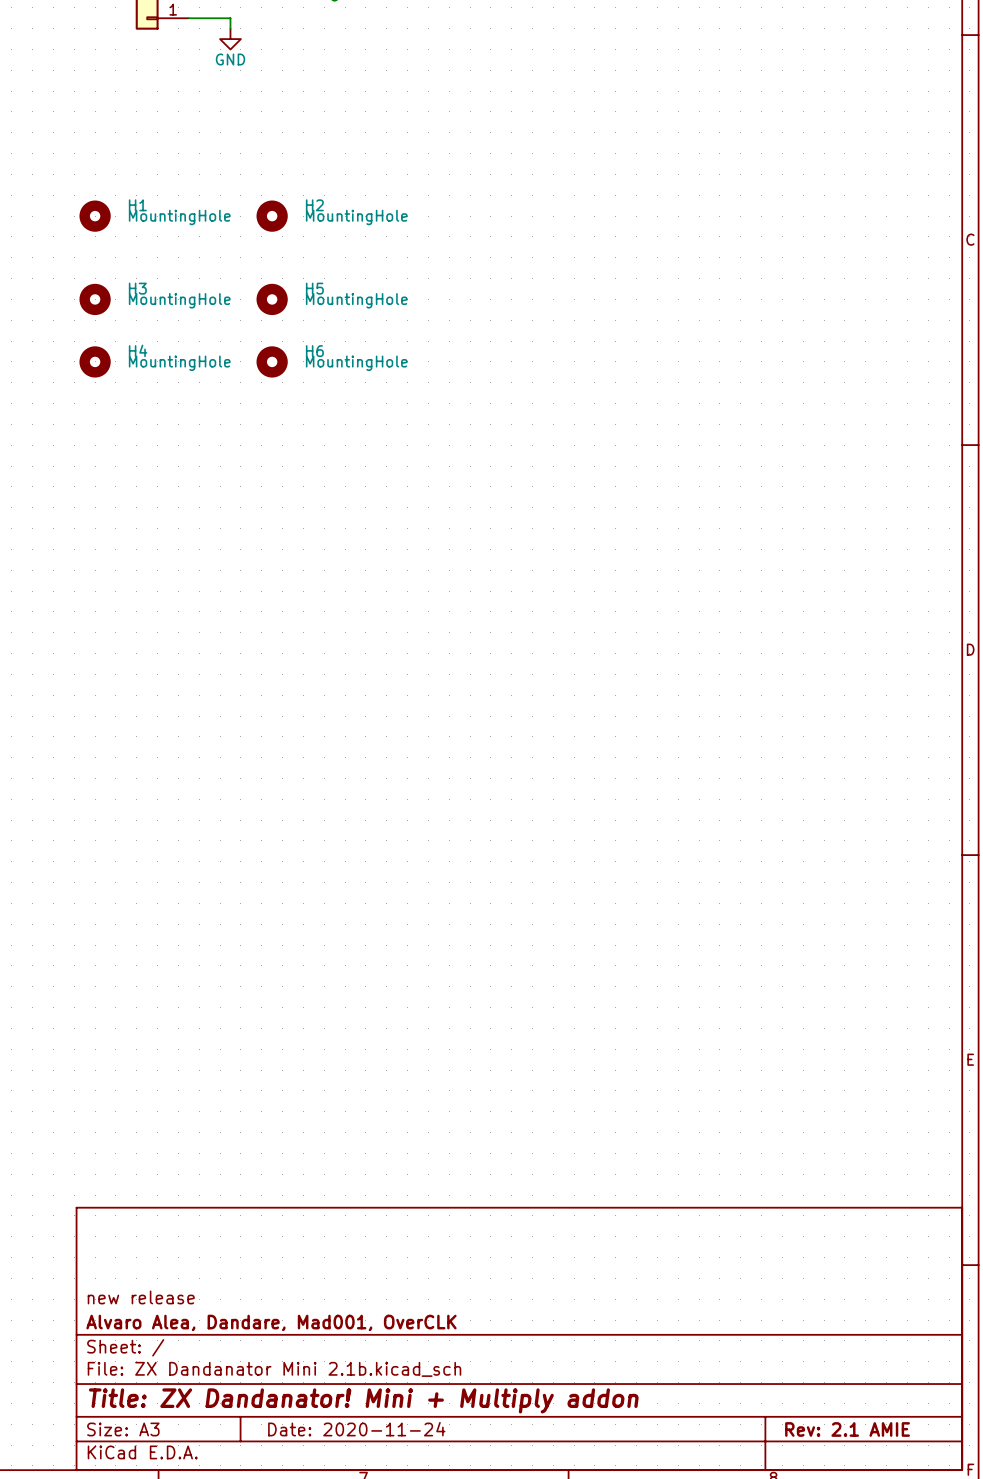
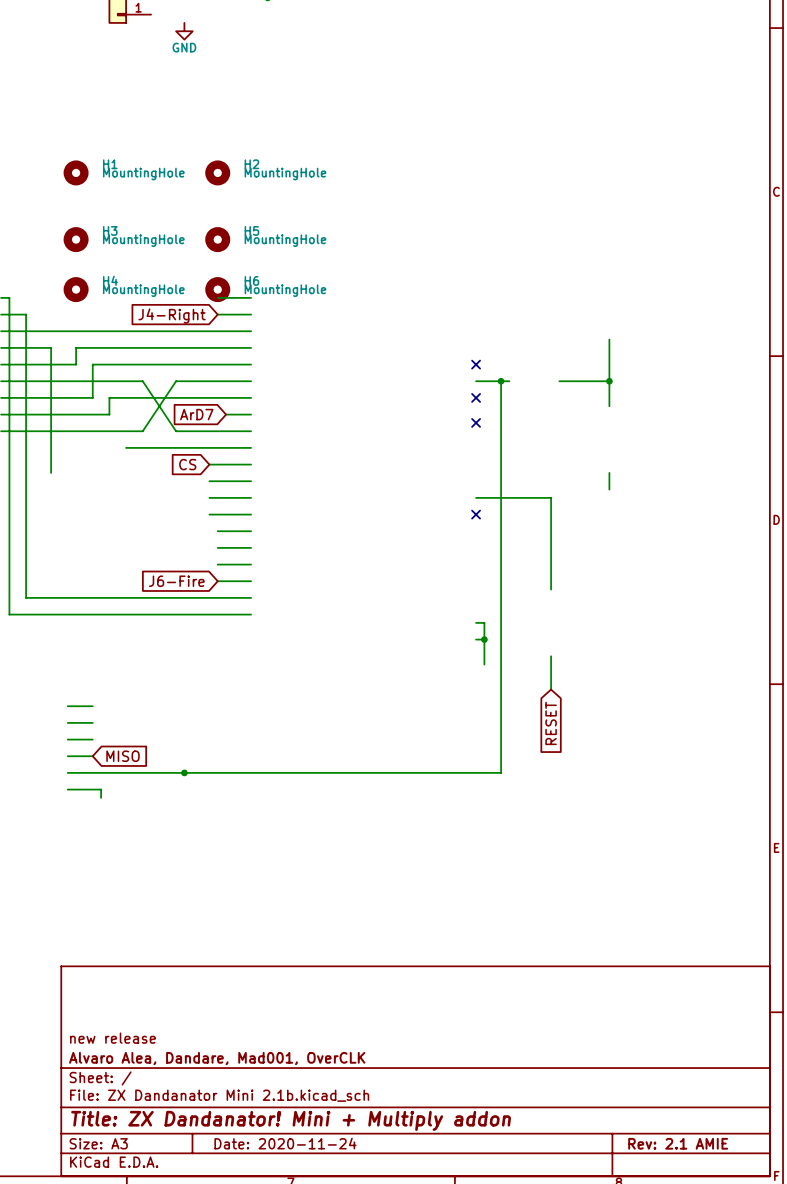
wire: (188, 18) (230, 18) (230, 28) -> none
wire: none -> (1, 297) (9, 297) (9, 614) (251, 614)
wire: none -> (217, 297) (251, 297)
wire: none -> (1, 314) (26, 314) (26, 597) (251, 597)
wire: none -> (217, 314) (251, 314)
global label: none -> J4-Right (172, 316)
wire: none -> (1, 331) (251, 331)
wire: none -> (609, 339) (609, 406)
wire: none -> (1, 347) (51, 347) (51, 472)
wire: none -> (251, 347) (76, 347) (76, 364) (1, 364)
wire: none -> (251, 364) (92, 364) (92, 397) (1, 397)
no-connect mark: none -> (476, 364)
wire: none -> (1, 381) (142, 381) (176, 431) (251, 431)
wire: none -> (251, 381) (176, 381) (142, 431) (1, 431)
wire: none -> (476, 381) (509, 381)
wire: none -> (501, 381) (501, 772) (67, 772)
junction: none -> (501, 381)
wire: none -> (559, 381) (609, 381)
junction: none -> (609, 381)
wire: none -> (251, 397) (109, 397) (109, 414) (1, 414)
no-connect mark: none -> (476, 397)
global label: none -> ArD7 (196, 414)
wire: none -> (226, 414) (251, 414)
no-connect mark: none -> (476, 422)
wire: none -> (126, 447) (251, 447)
global label: none -> CS (187, 464)
wire: none -> (209, 464) (251, 464)
wire: none -> (609, 472) (609, 489)
wire: none -> (209, 481) (251, 481)
wire: none -> (209, 497) (251, 497)
wire: none -> (476, 497) (551, 497) (551, 589)
wire: none -> (209, 514) (251, 514)
no-connect mark: none -> (476, 514)
wire: none -> (217, 531) (251, 531)
wire: none -> (217, 547) (251, 547)
wire: none -> (217, 564) (251, 564)
global label: none -> J6-Fire (176, 581)
wire: none -> (217, 581) (251, 581)
wire: none -> (476, 622) (484, 622) (484, 664)
wire: none -> (476, 639) (484, 639)
junction: none -> (484, 639)
wire: none -> (551, 656) (551, 689)
wire: none -> (67, 706) (92, 706)
wire: none -> (67, 722) (92, 722)
global label: none -> RESET (551, 723)
wire: none -> (67, 739) (92, 739)
wire: none -> (67, 756) (92, 756)
global label: none -> MISO (122, 756)
junction: none -> (184, 772)
wire: none -> (67, 789) (101, 789) (101, 797)

